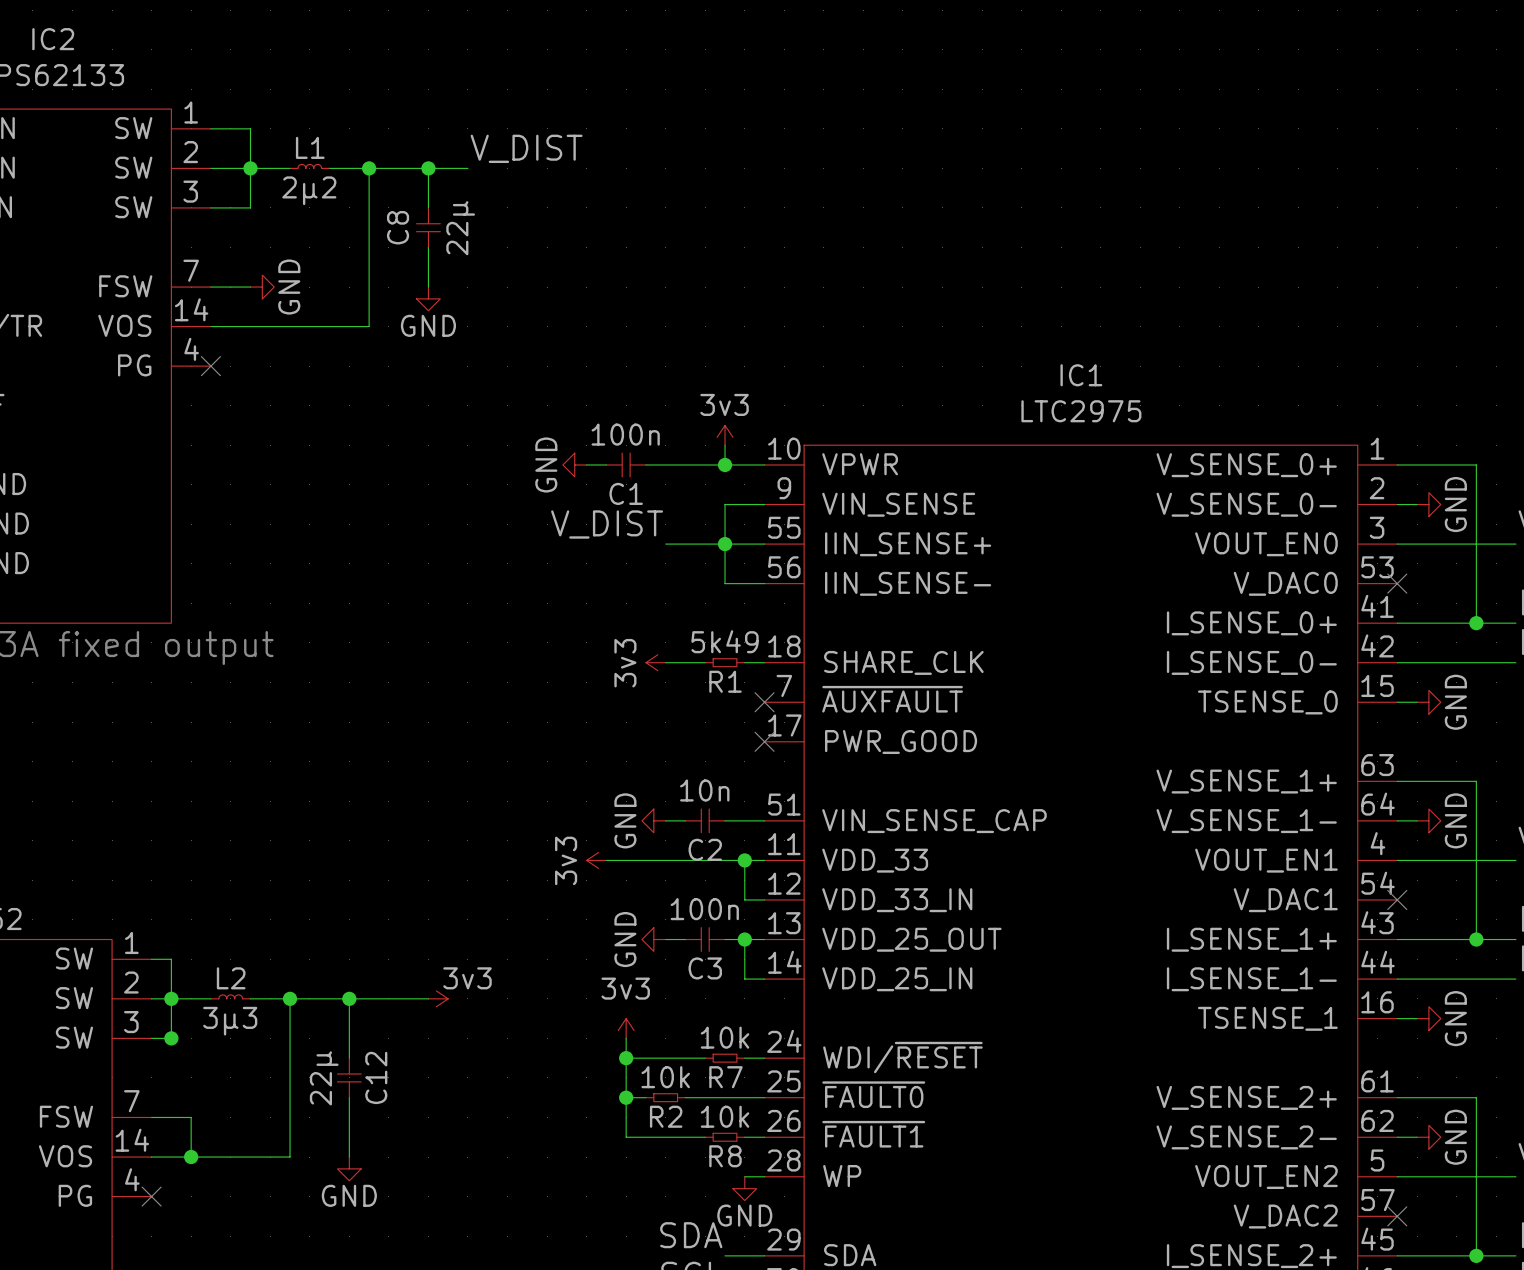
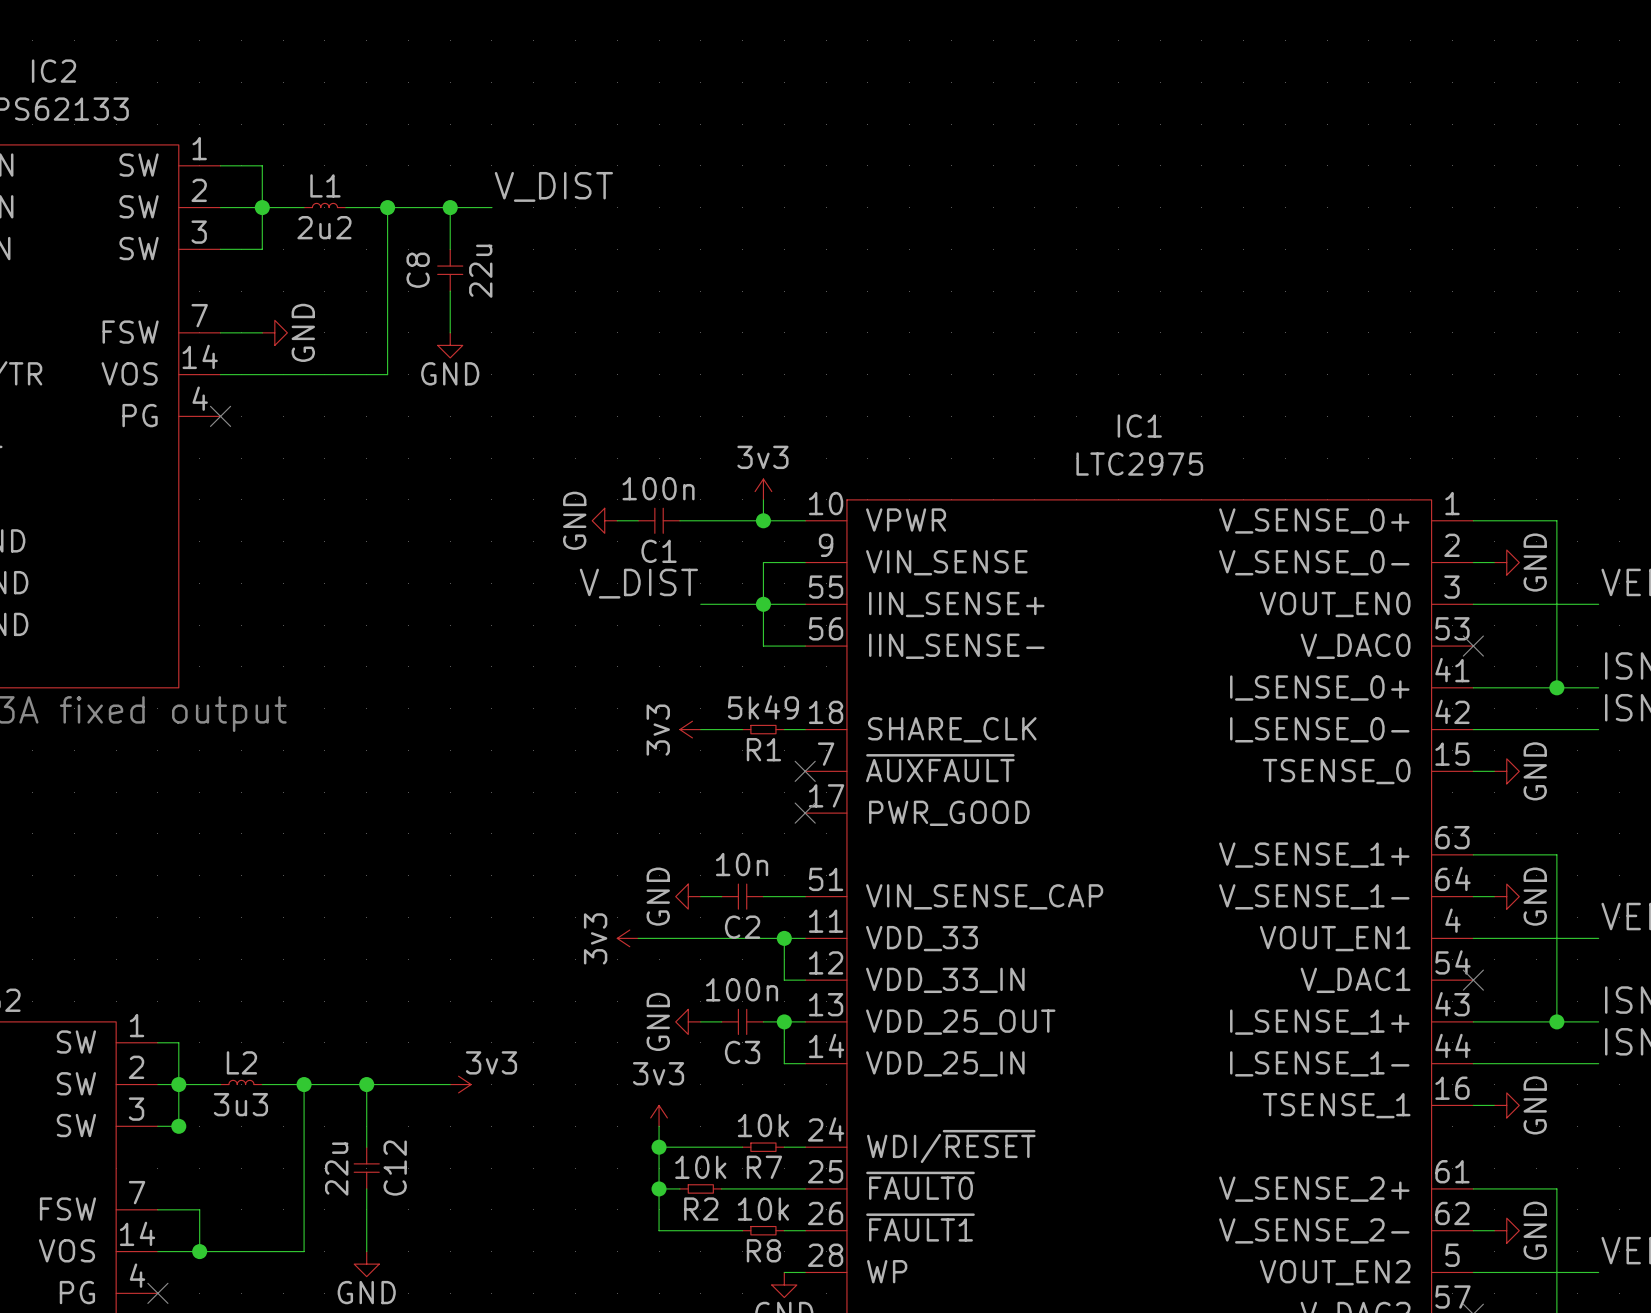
L1 value: 2µ2 (309, 190) -> 2u2 (324, 227)
C8 value: 22µ (460, 228) -> 22u (480, 271)
L2 value: 3µ3 (230, 1021) -> 3u3 (240, 1104)
C12 value: 22µ (324, 1078) -> 22u (336, 1169)

